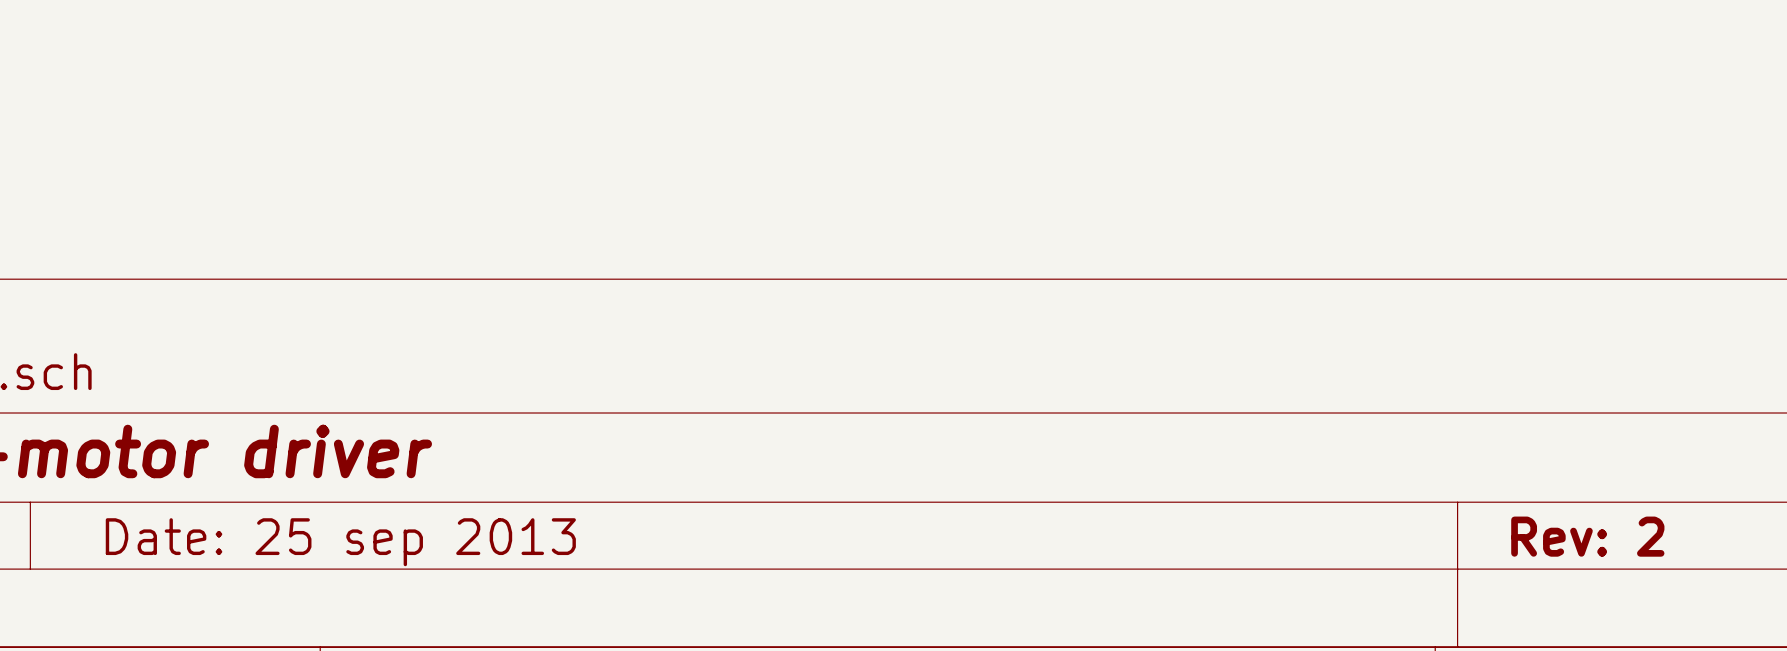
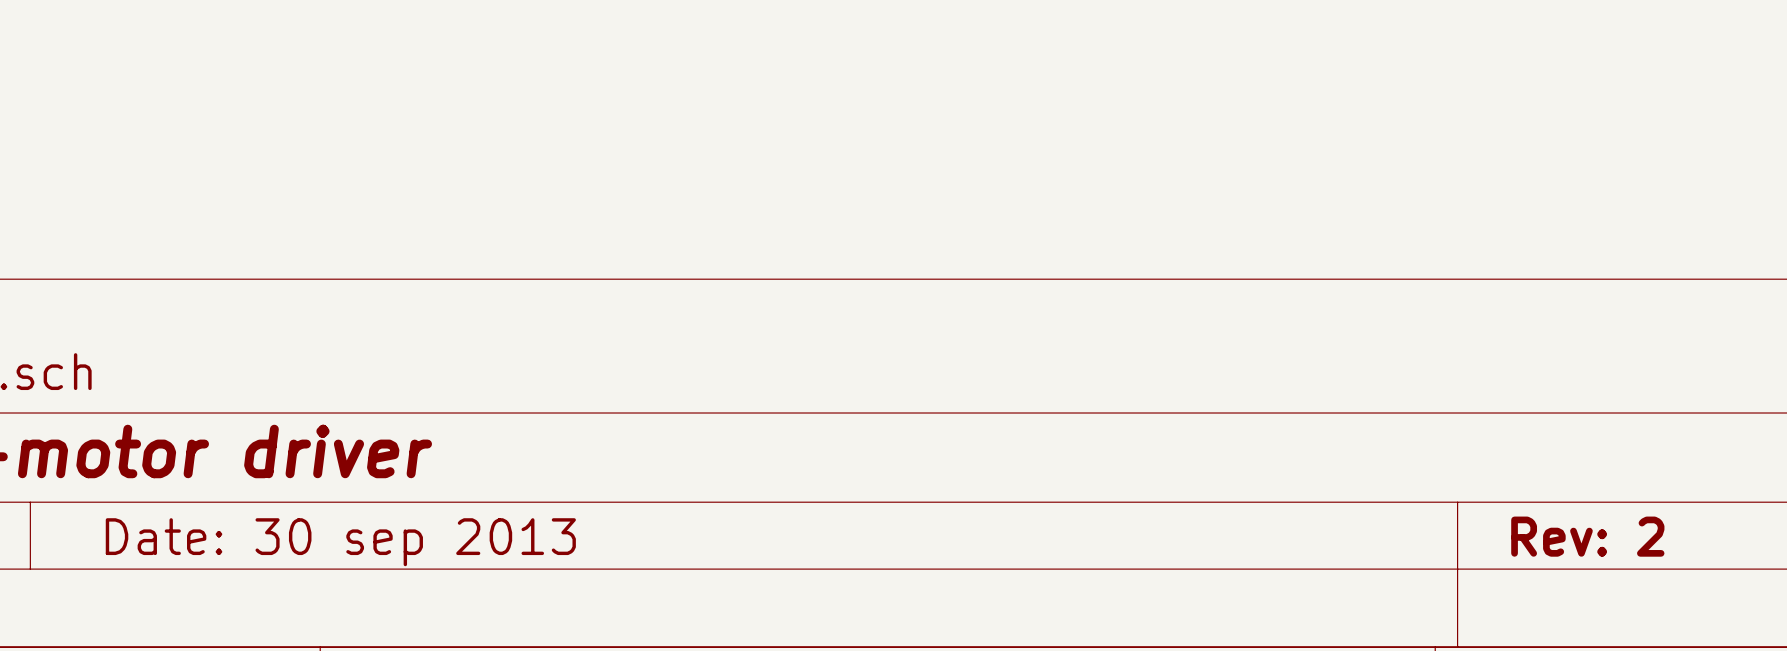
title block: Date: 25 sep 2013 (340, 542) -> Date: 30 sep 2013 (340, 542)

